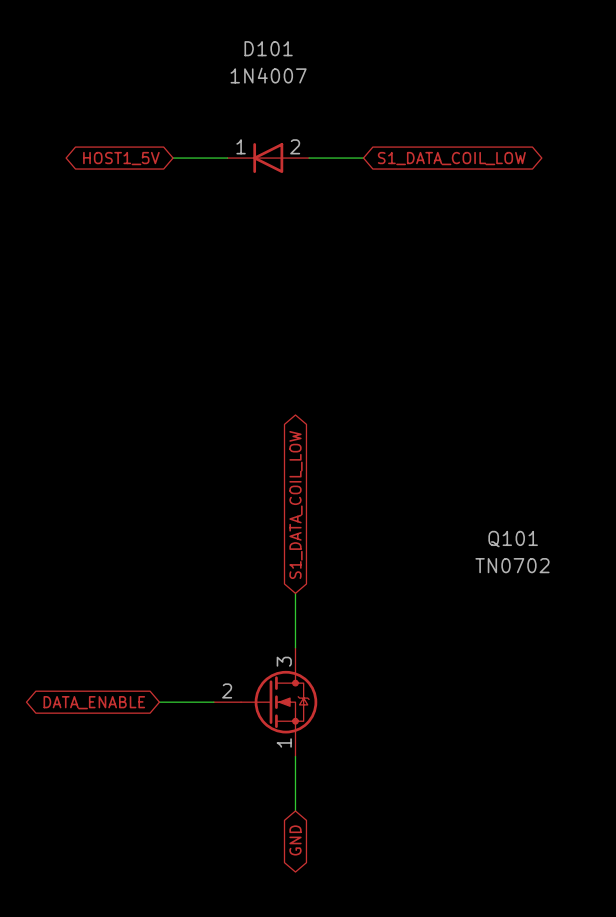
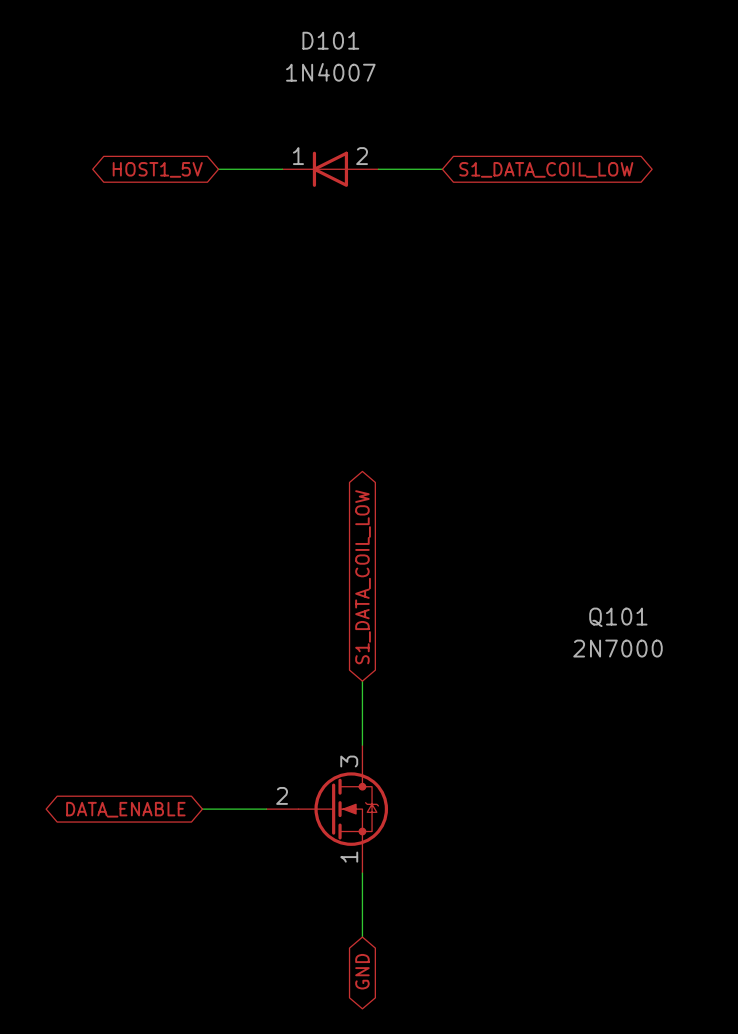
Q101 value: TN0702 (512, 565) -> 2N7000 (617, 648)

